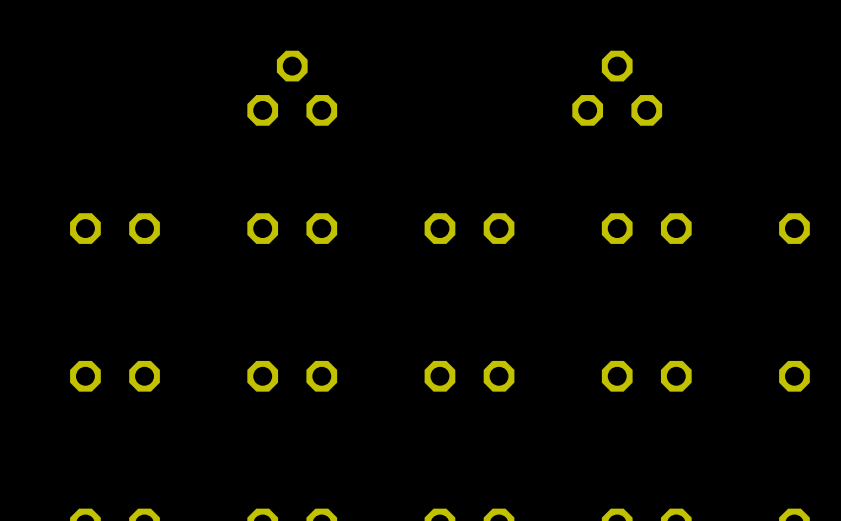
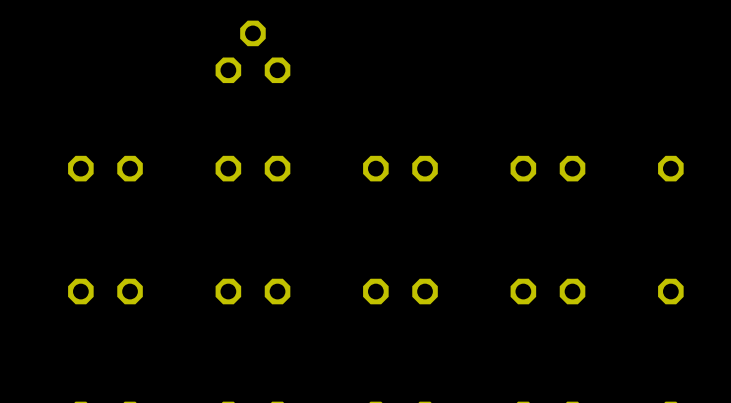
part: (617, 88) -> none

